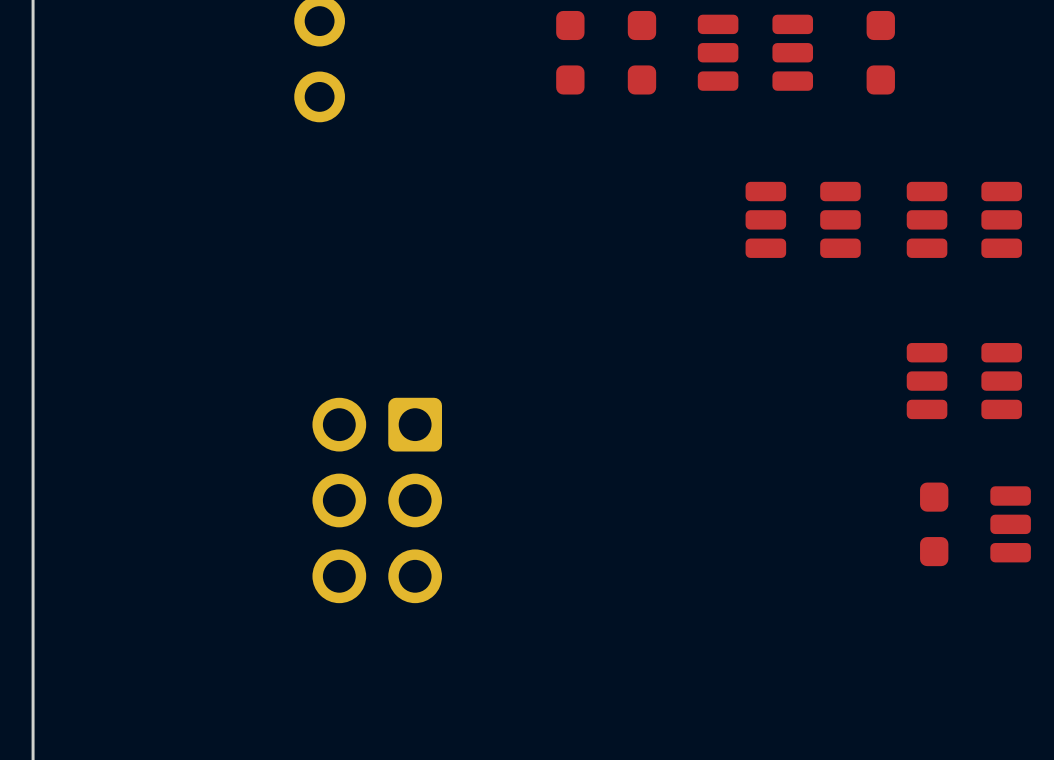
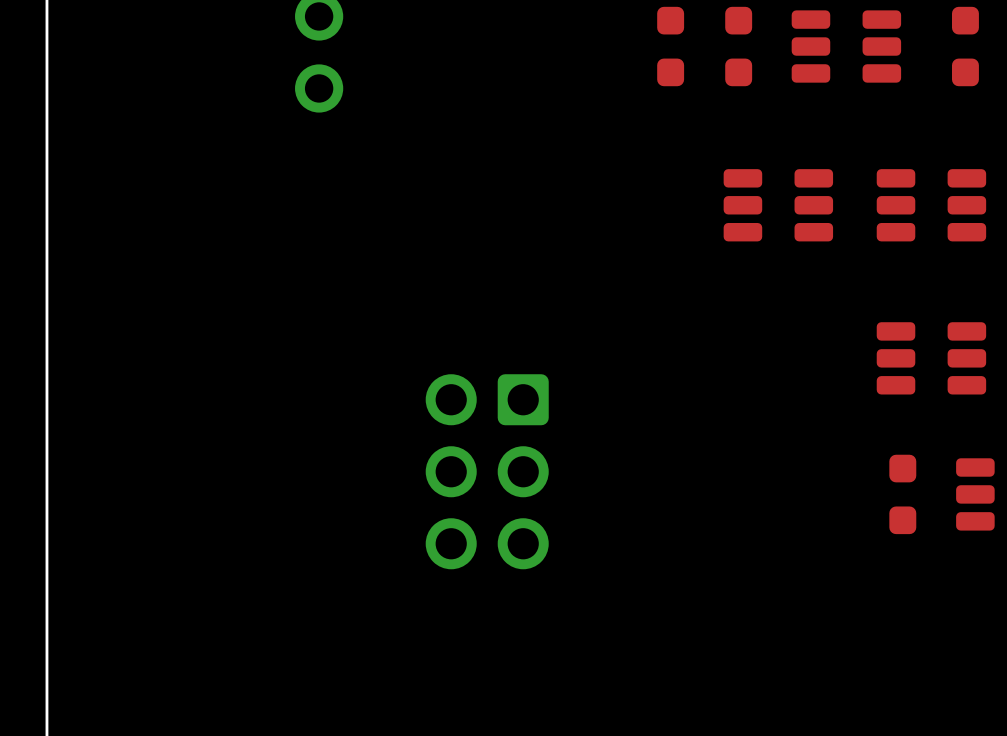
part footprint: [866, 10, 895, 95] -> [791, 10, 902, 83]
part footprint: [697, 14, 814, 91] -> [725, 6, 753, 87]
part: (570, 52) -> none
part position: (641, 52) -> (670, 46)
part: none -> (965, 46)
part position: (377, 500) -> (487, 471)

